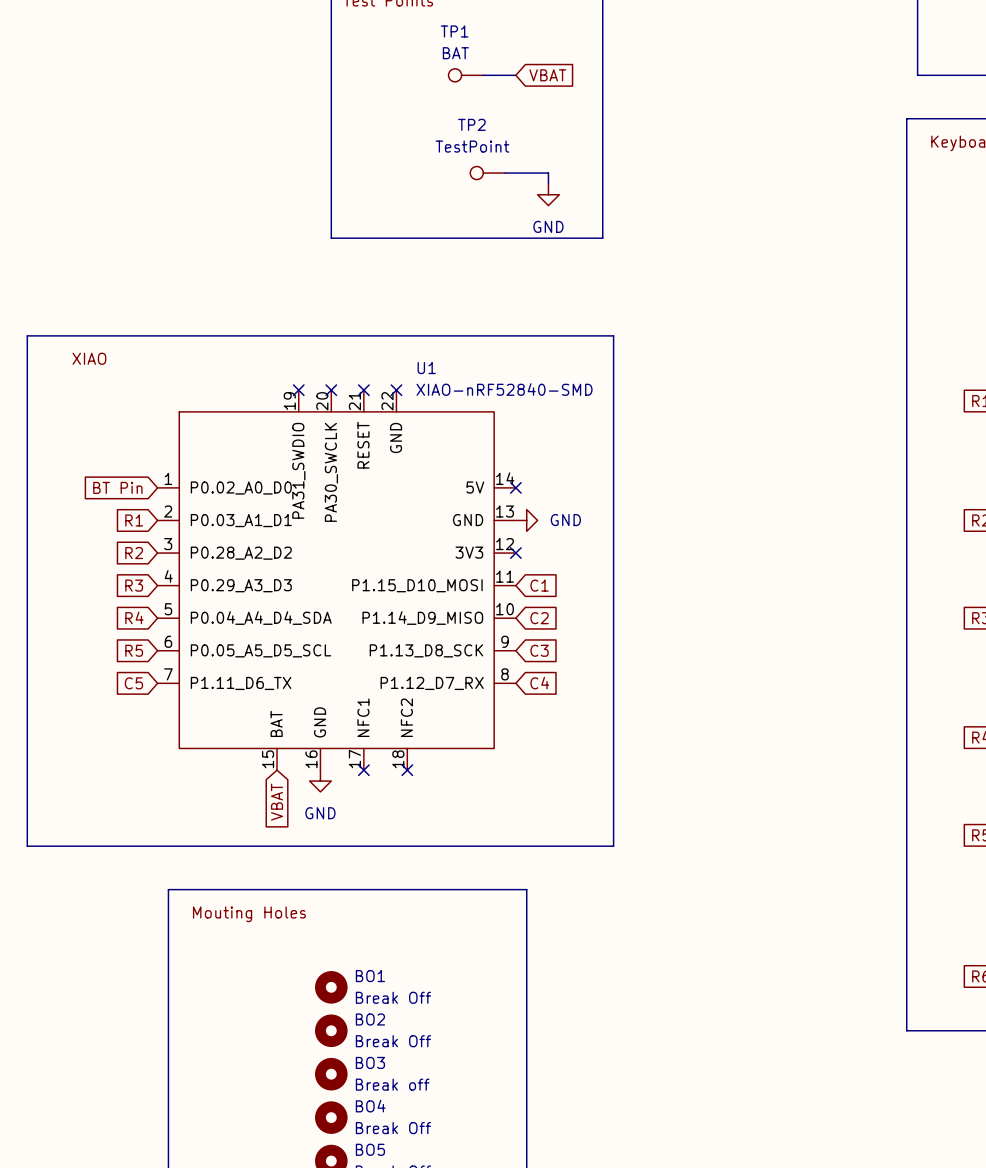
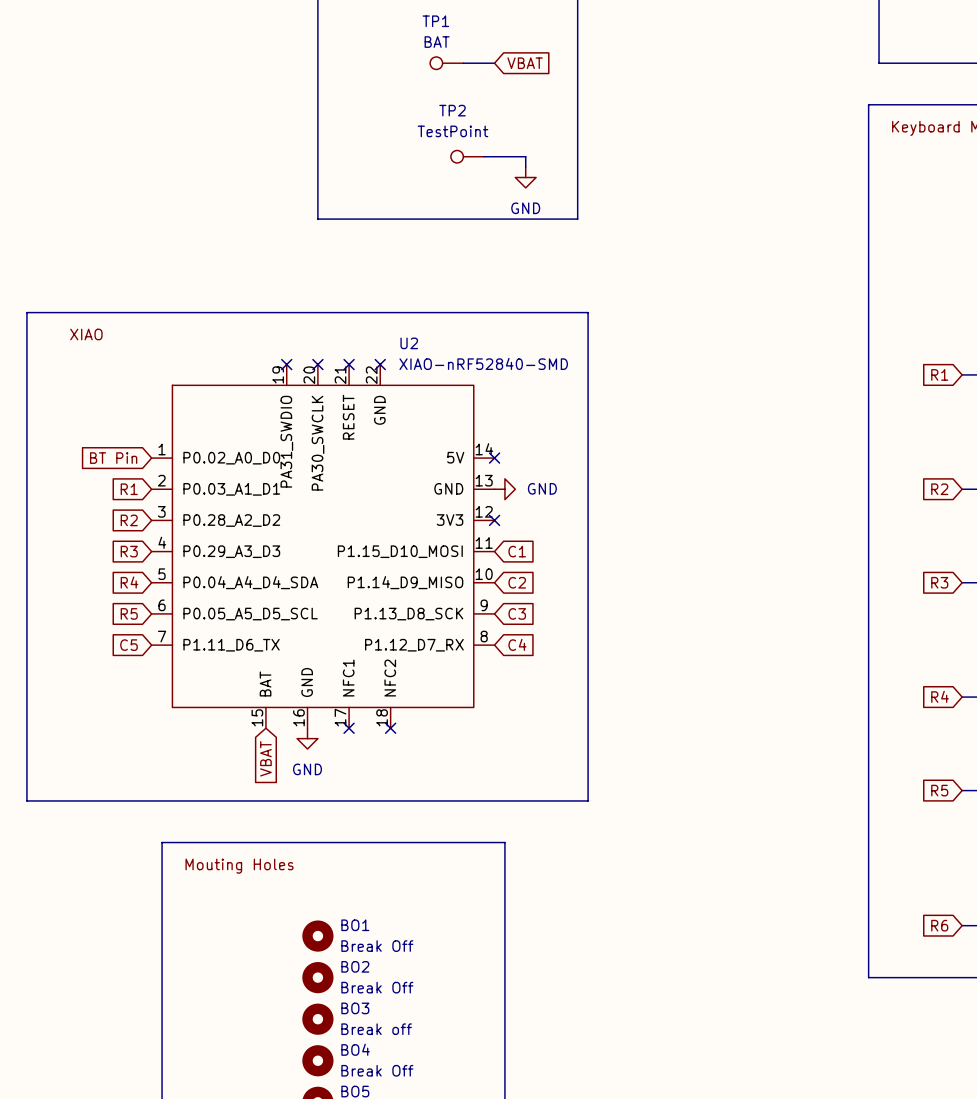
U1 name: U1 (426, 368) -> U2 (409, 343)

